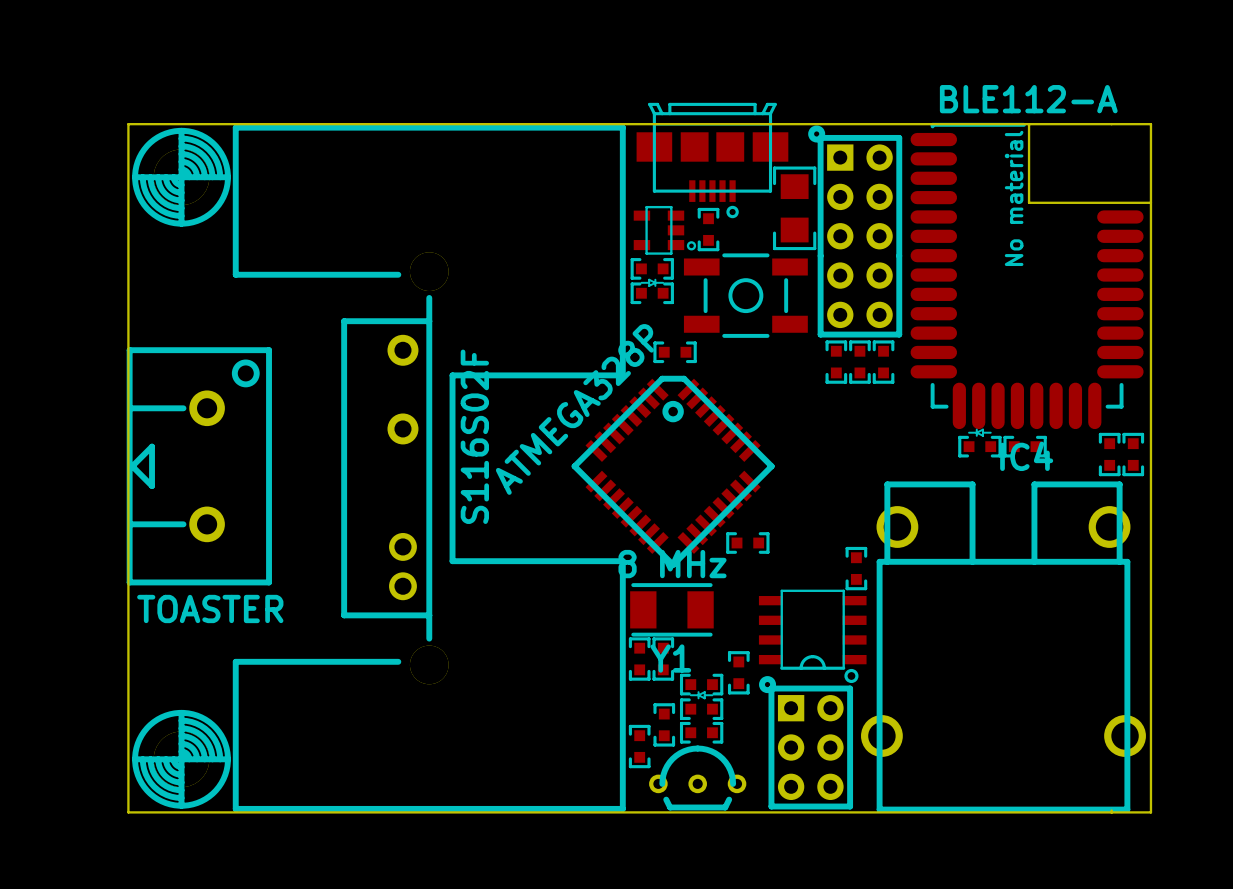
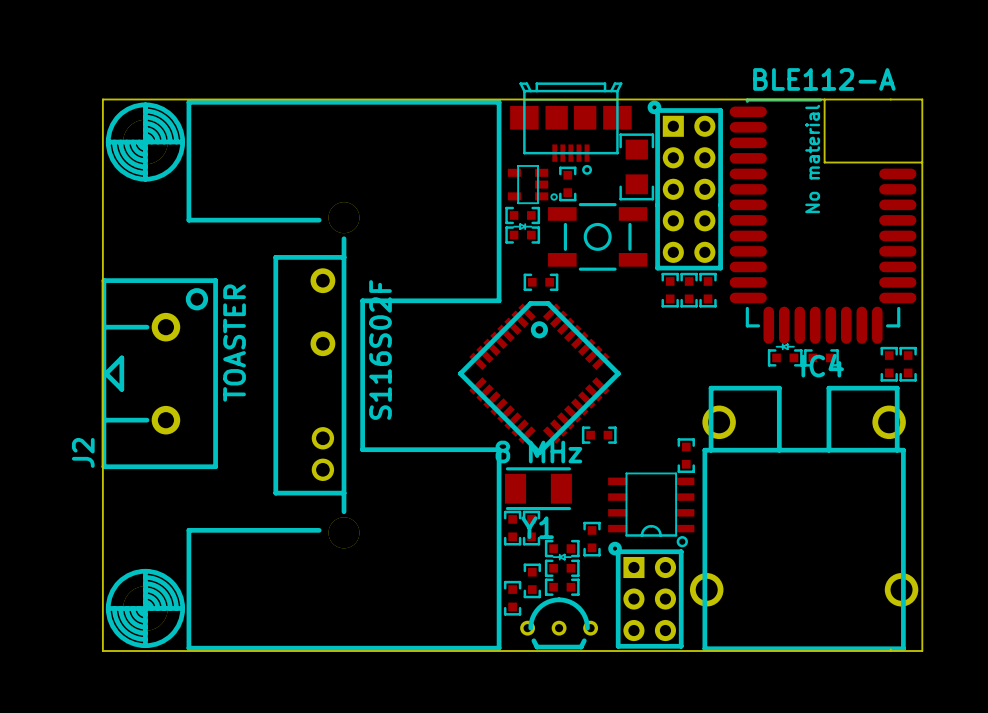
part value: ATMEGA328P (574, 409) -> none
J2 name: none -> J2 (83, 452)
J2 value rotation: 0° (210, 608) -> 90° counterclockwise (234, 343)
J2 value position: TOASTER (210, 608) -> TOASTER (234, 343)

